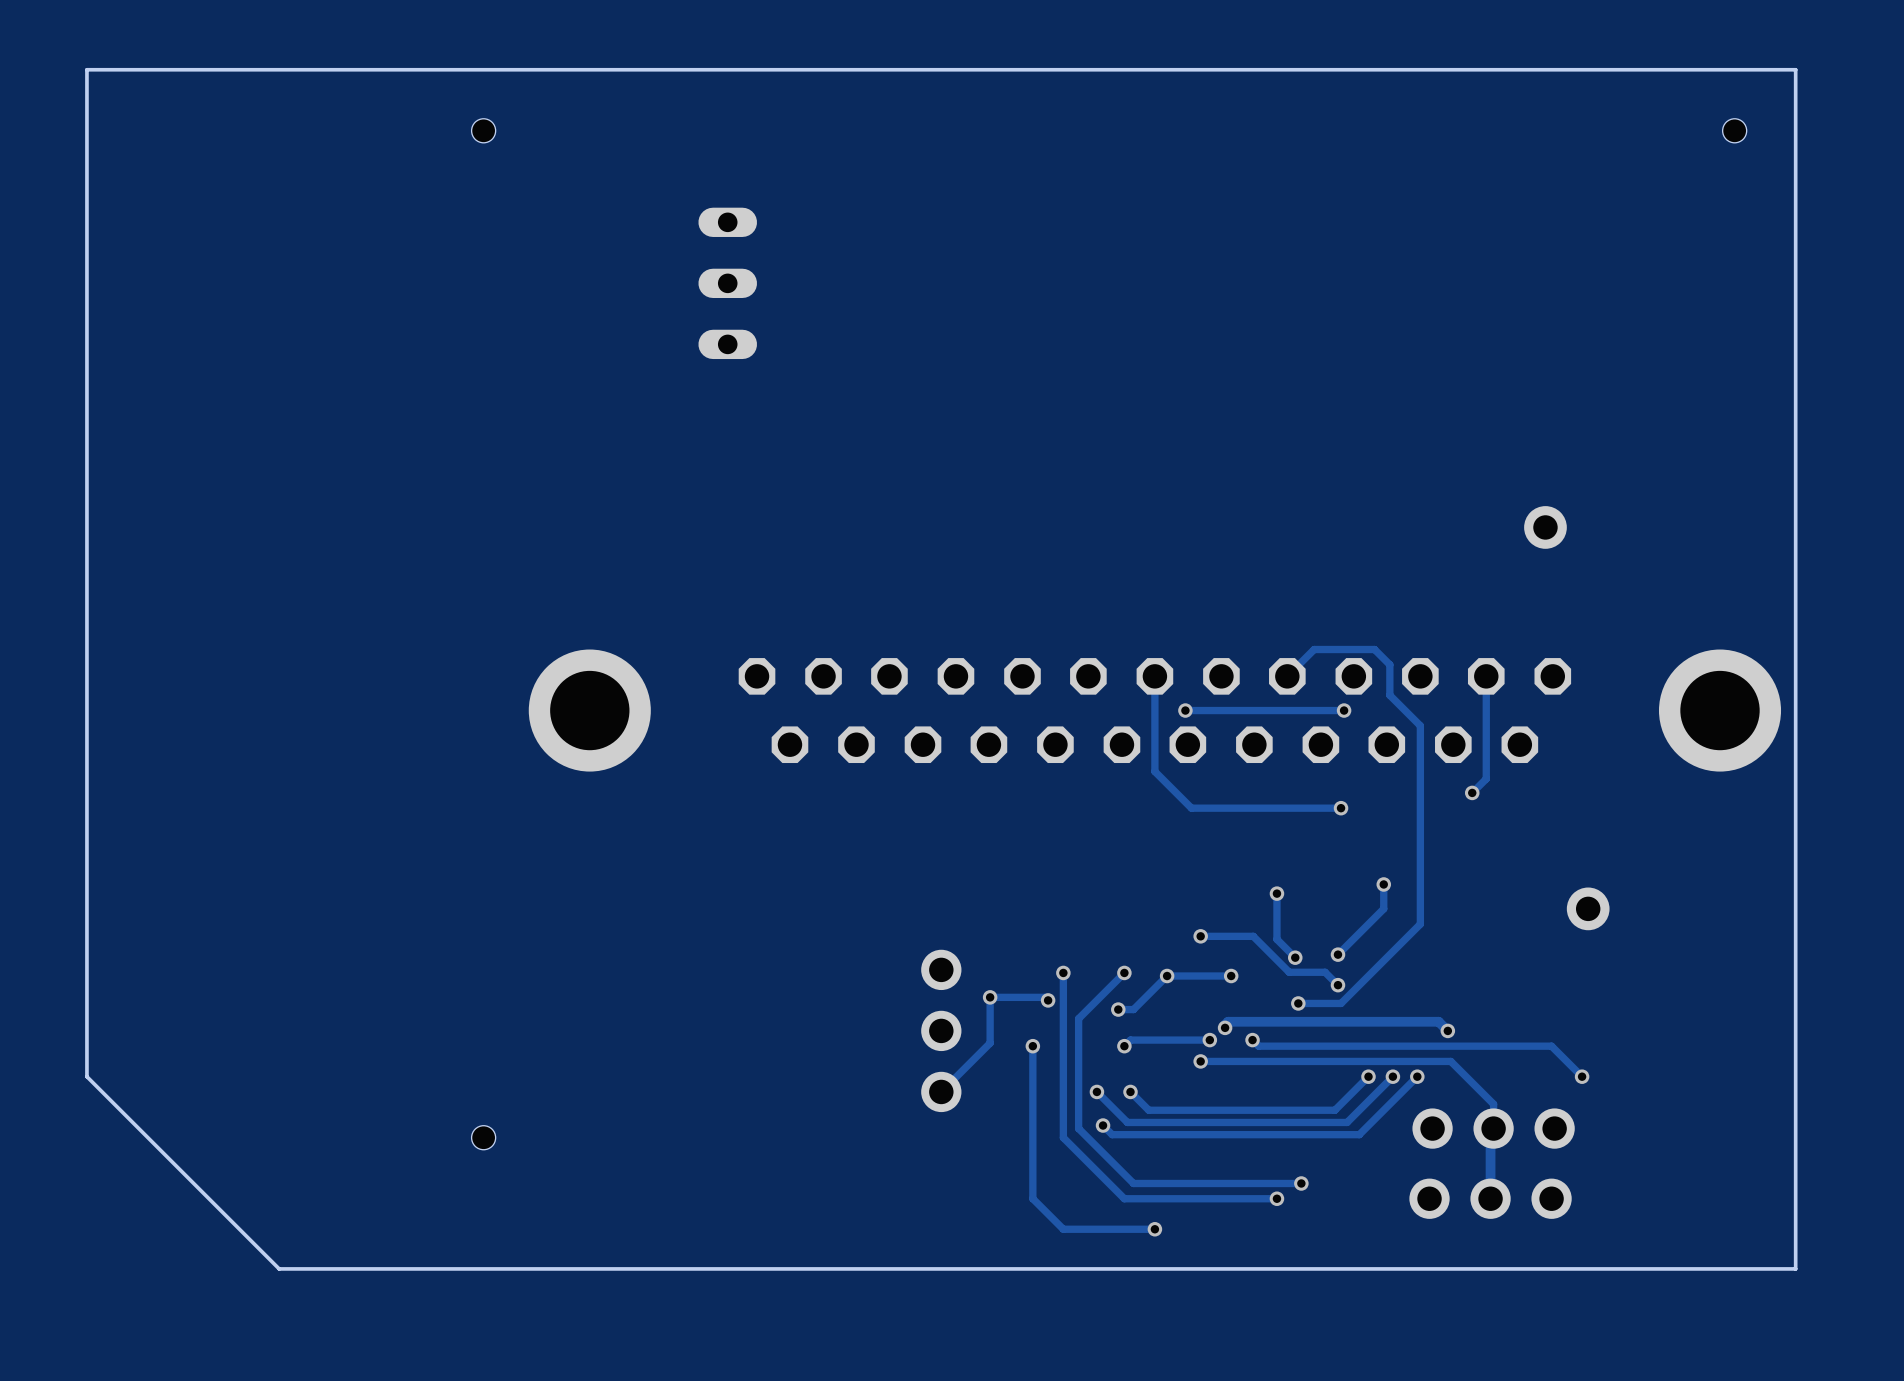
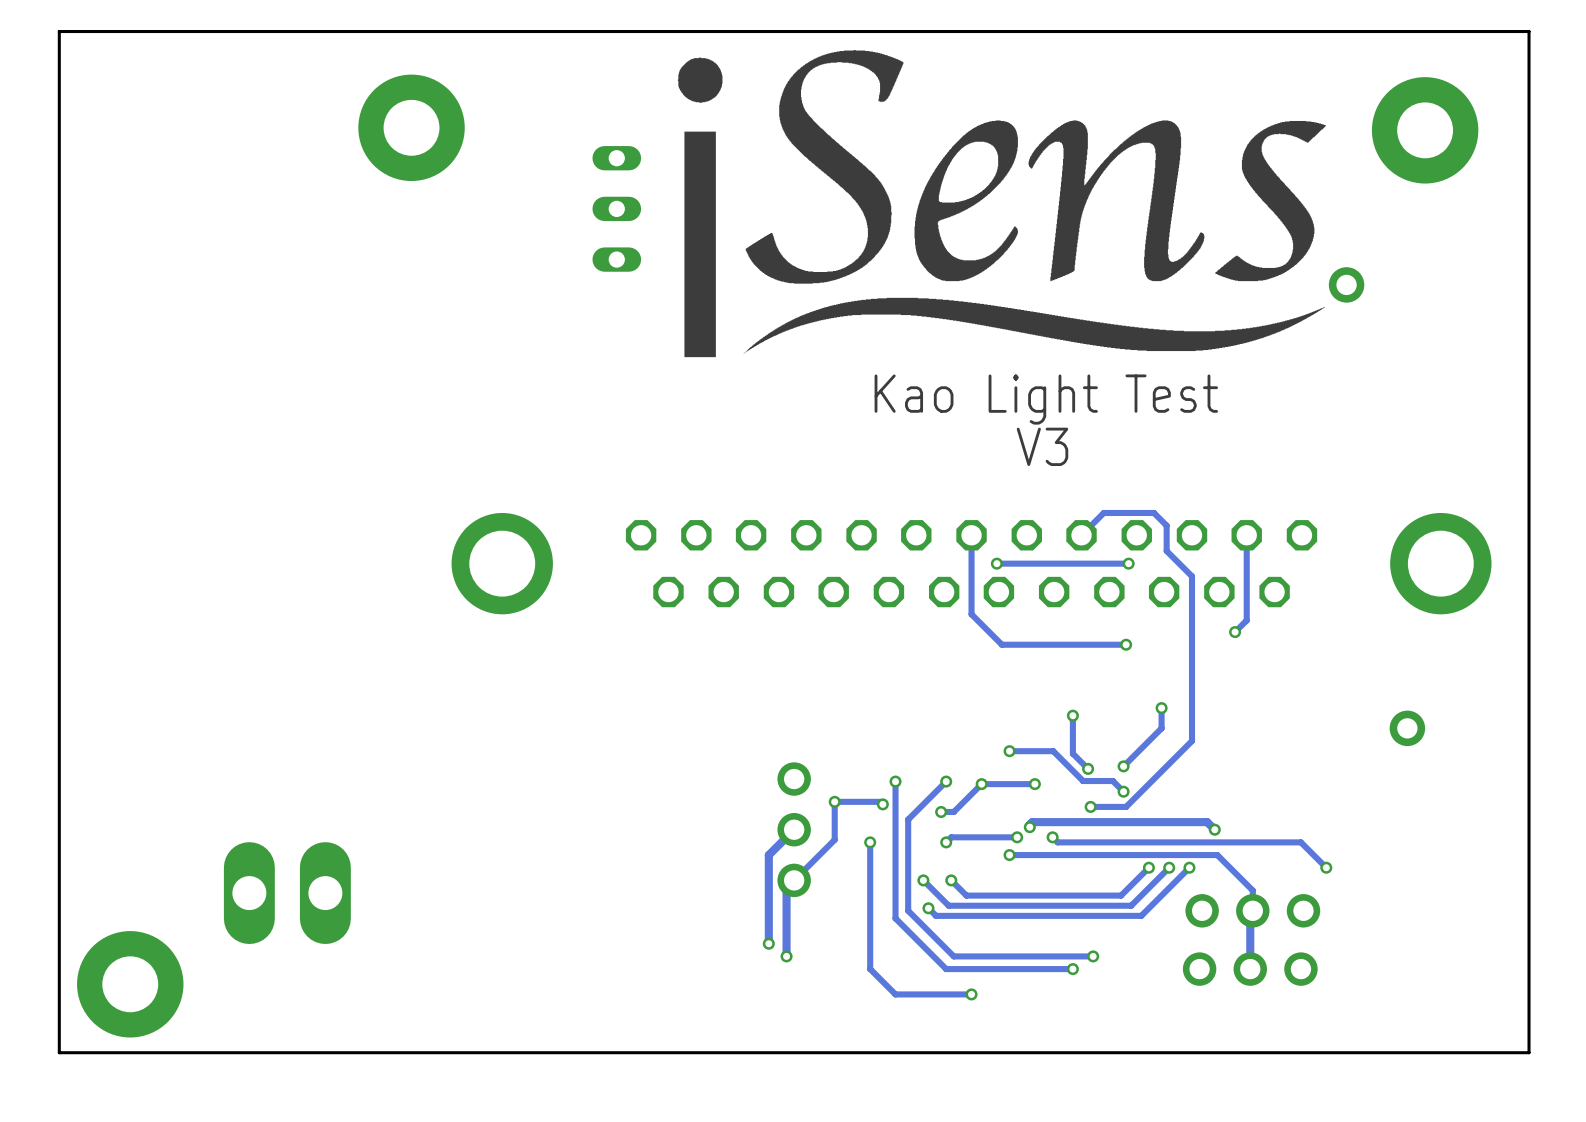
board edge: (1795, 69) (1795, 1268) (279, 1268) (86, 1076) (86, 69) -> (1503, 31) (1529, 31) (1529, 1052) (59, 1052) (59, 31) (84, 31)
drawing: none -> [743, 50, 1326, 354]
drawing: none -> [677, 57, 723, 103]
hole: (483, 130) -> none
hole: (1734, 130) -> none
drawing: none -> [1215, 120, 1327, 282]
part: none -> (411, 127)
part: none -> (1425, 130)
drawing: none -> [684, 131, 716, 358]
text: none -> Kao Light Test (1046, 399)
part position: (1545, 527) -> (1346, 284)
text: none -> V3 (1042, 446)
part position: (1588, 908) -> (1407, 728)
track: none -> (794, 829) (768, 855) (768, 943)
track: none -> (794, 880) (786, 888) (786, 956)
part: none -> (287, 893)
hole: (483, 1137) -> none
via: none -> (768, 943)
via: none -> (786, 956)
part: none -> (130, 984)

